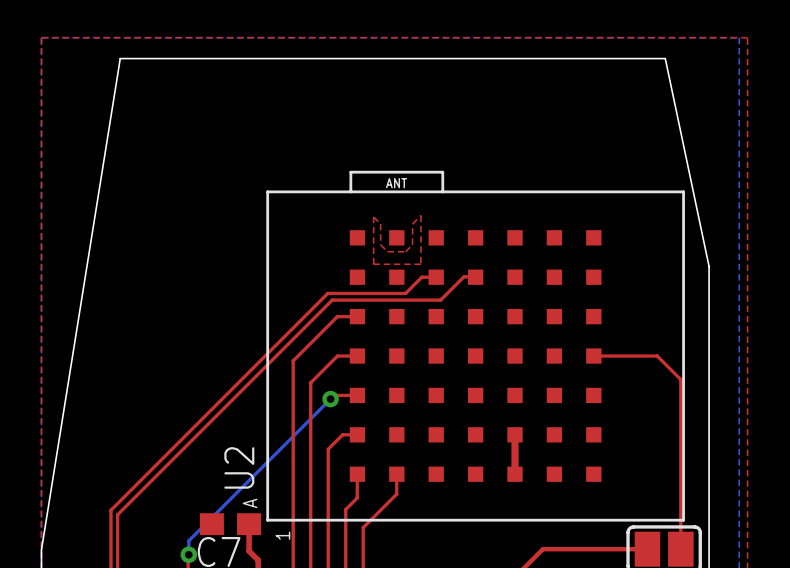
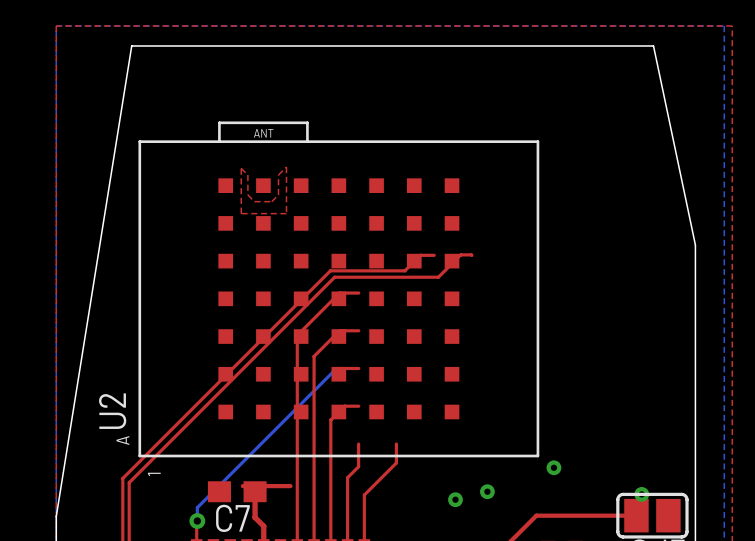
top zone outline: (420, 215) (420, 264) (373, 264) (373, 217) (380, 223) (380, 244) (387, 251) (405, 251) (412, 244) (412, 223) (420, 215) -> (286, 167) (286, 213) (241, 213) (241, 168) (247, 175) (247, 194) (254, 201) (271, 201) (278, 194) (278, 175) (286, 167)
U2 position: (475, 346) -> (338, 289)
top track: (593, 356) (657, 356) (680, 379) (680, 549) -> none
via: (330, 399) -> none
top track: (515, 434) (515, 474) -> none
via: none -> (553, 467)
top track: none -> (242, 486) (290, 486)
via: none -> (487, 491)
via: none -> (641, 494)
via: none -> (455, 499)

